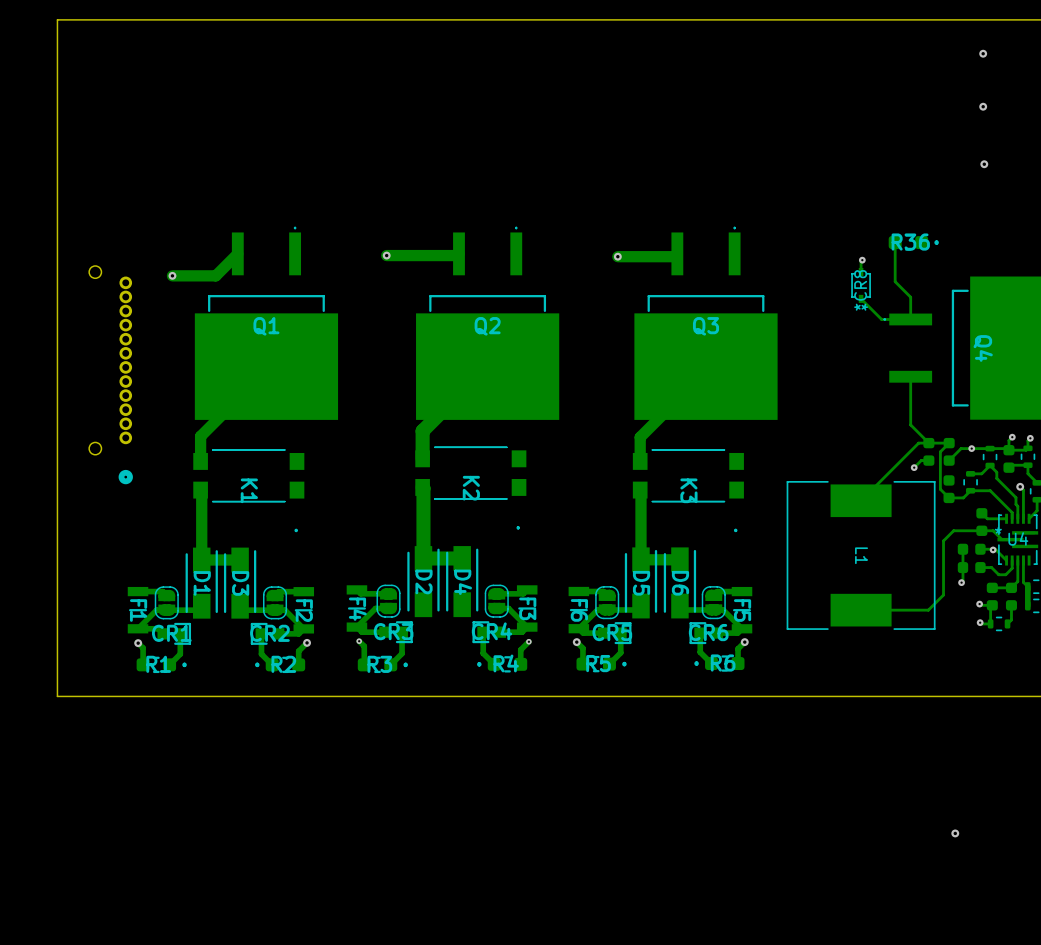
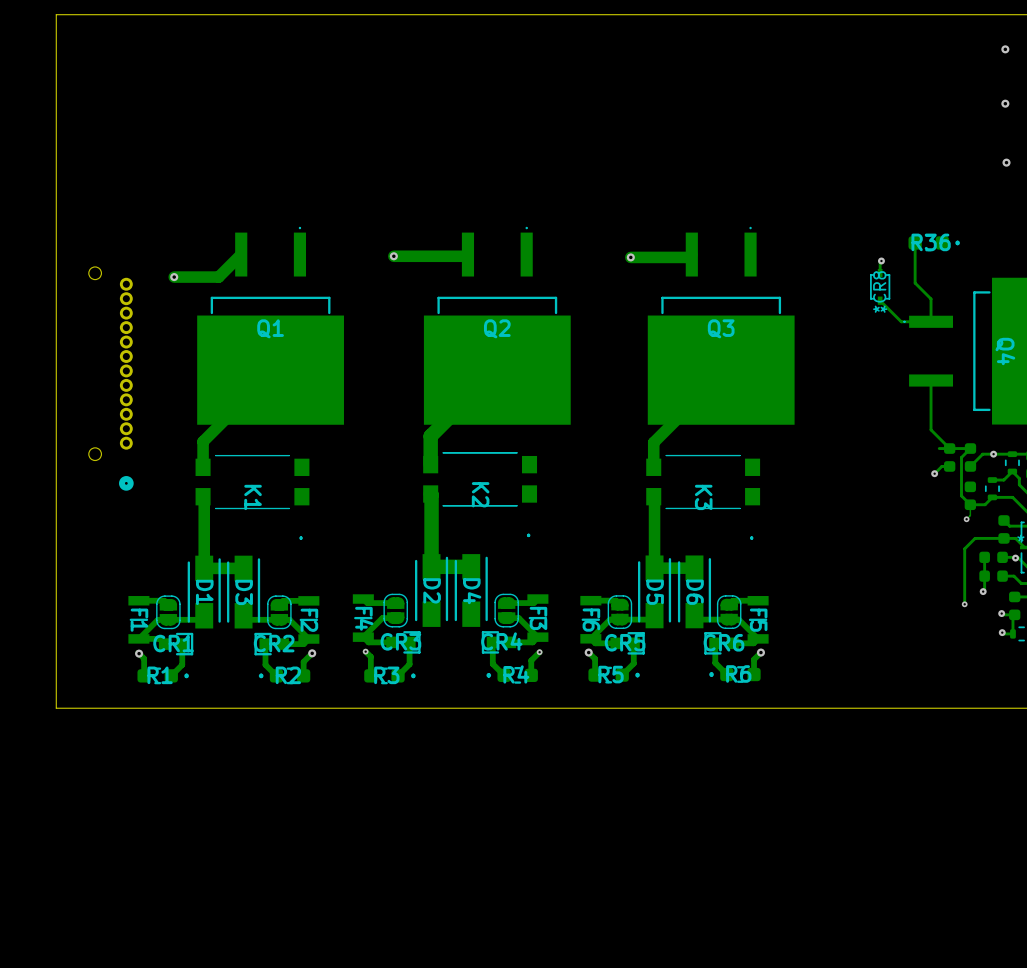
track: (918, 443) (861, 500) -> none
track: none -> (970, 504) (970, 515) (966, 519)
via: none -> (966, 519)
L1: (861, 555) -> none
track: (943, 595) (928, 610) (861, 610) -> none
via: none -> (964, 604)
via: (955, 833) -> none

